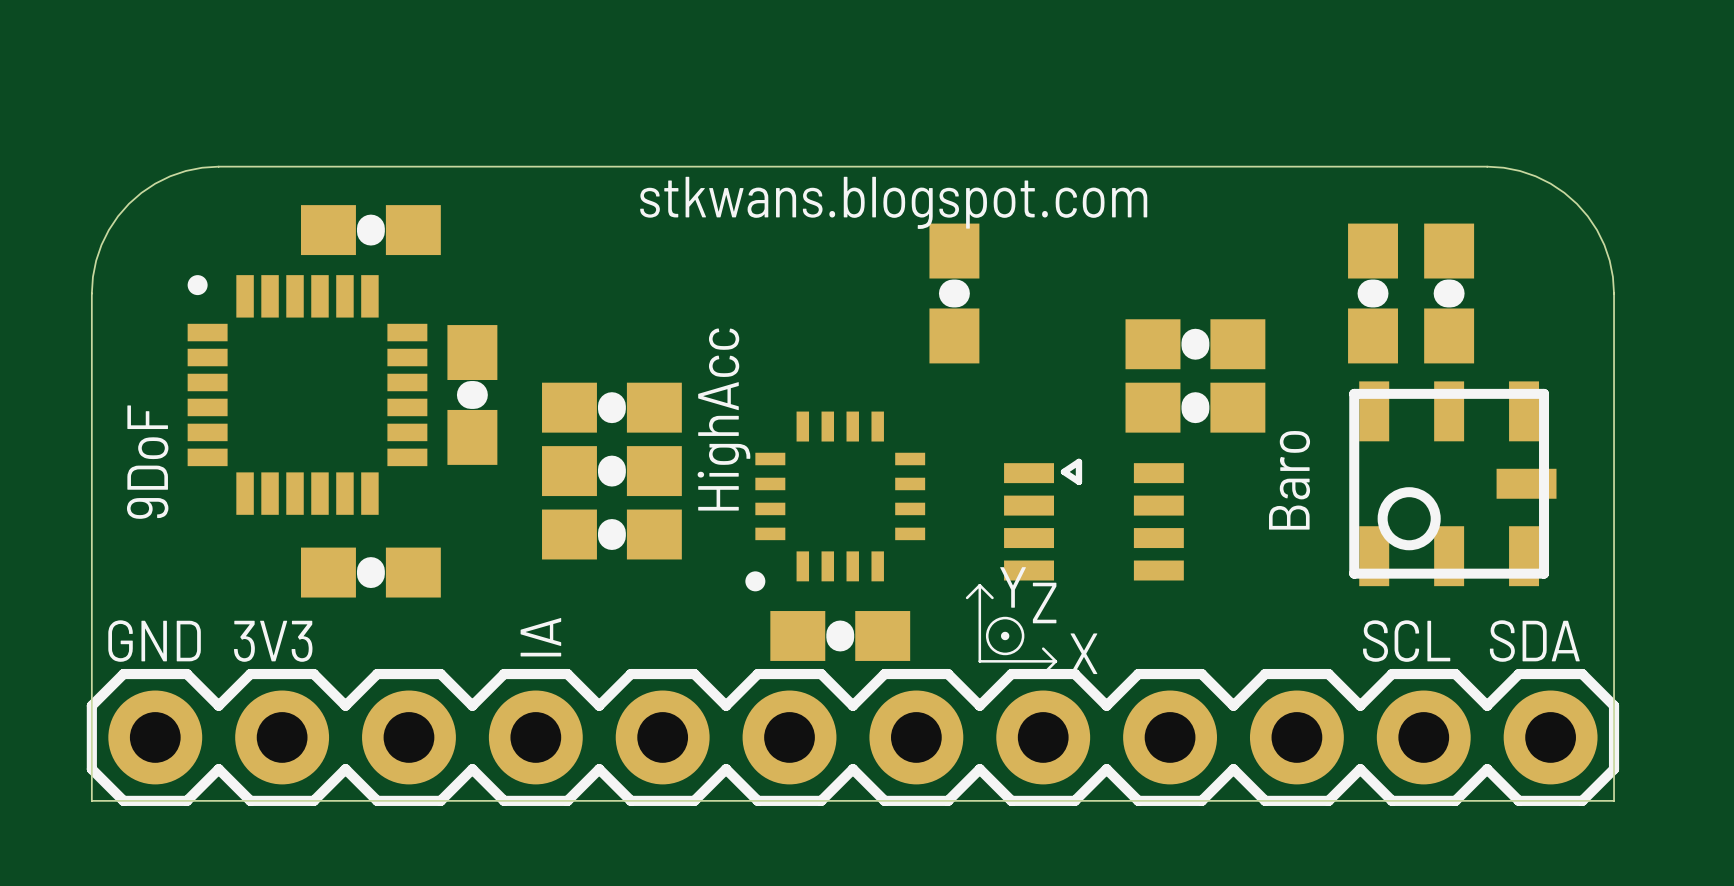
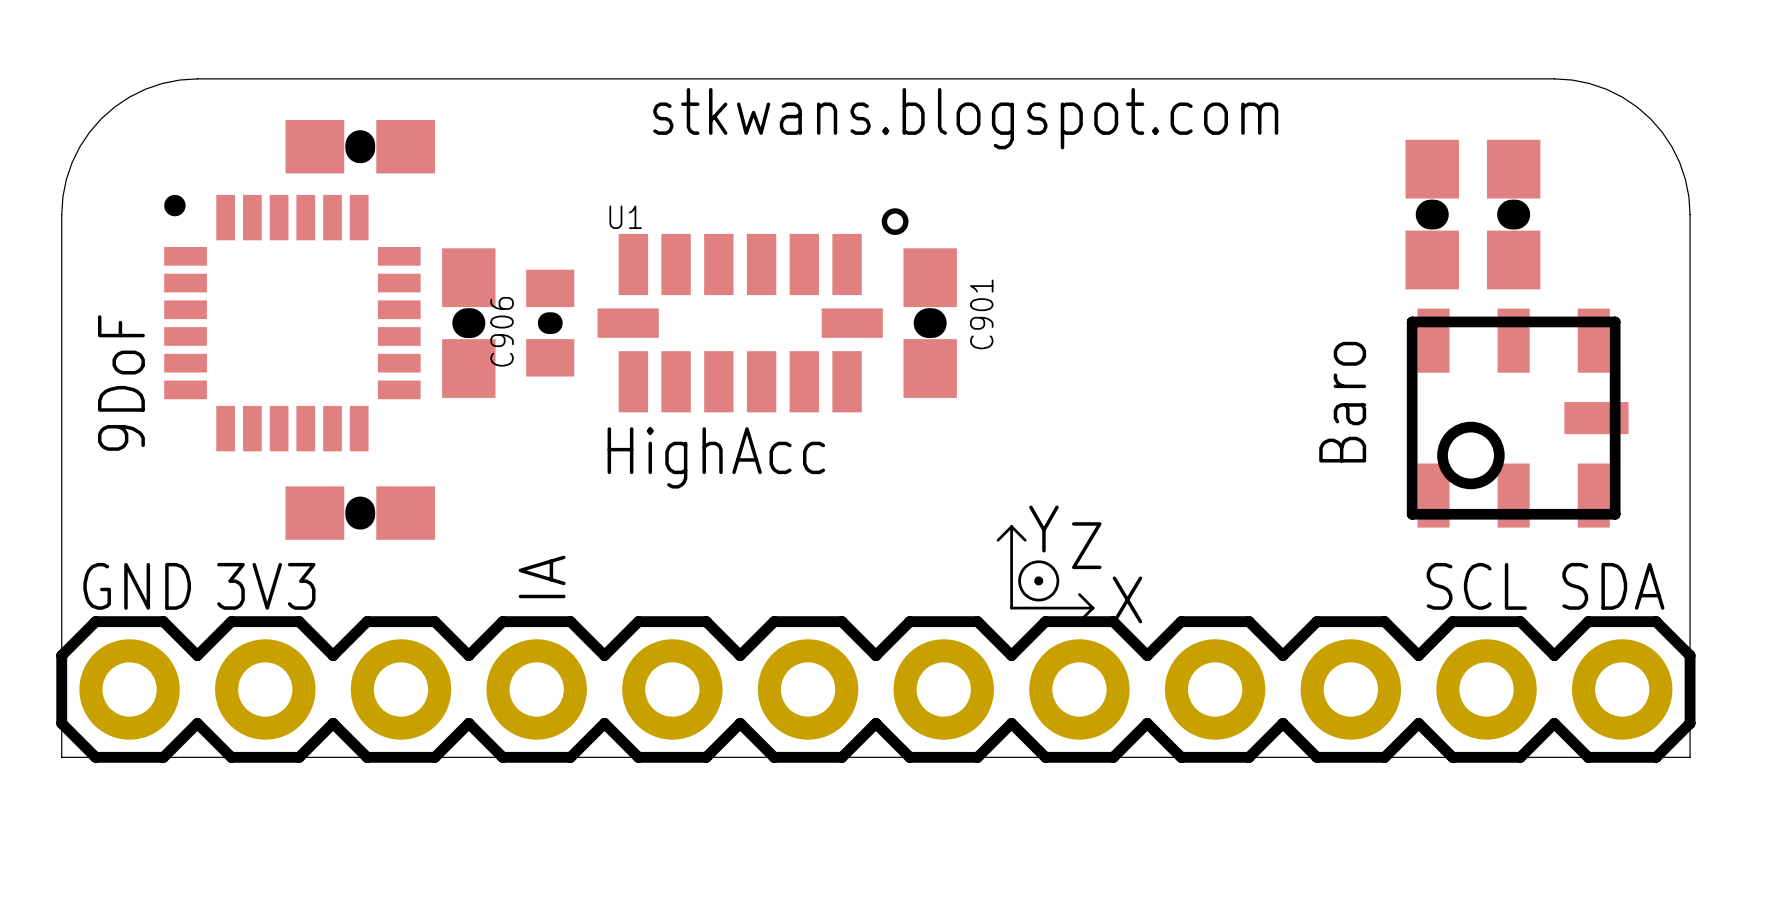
part: (954, 293) -> none
part: (1195, 344) -> none
U1: none -> (753, 310)
C906: none -> (550, 323)
C901: none -> (930, 323)
part: (611, 407) -> none
part: (1195, 407) -> none
text rotation: 0° (723, 419) -> 90° clockwise (716, 457)
part: (611, 471) -> none
part: (835, 501) -> none
part: (1093, 519) -> none
part: (611, 534) -> none
part: (840, 635) -> none

